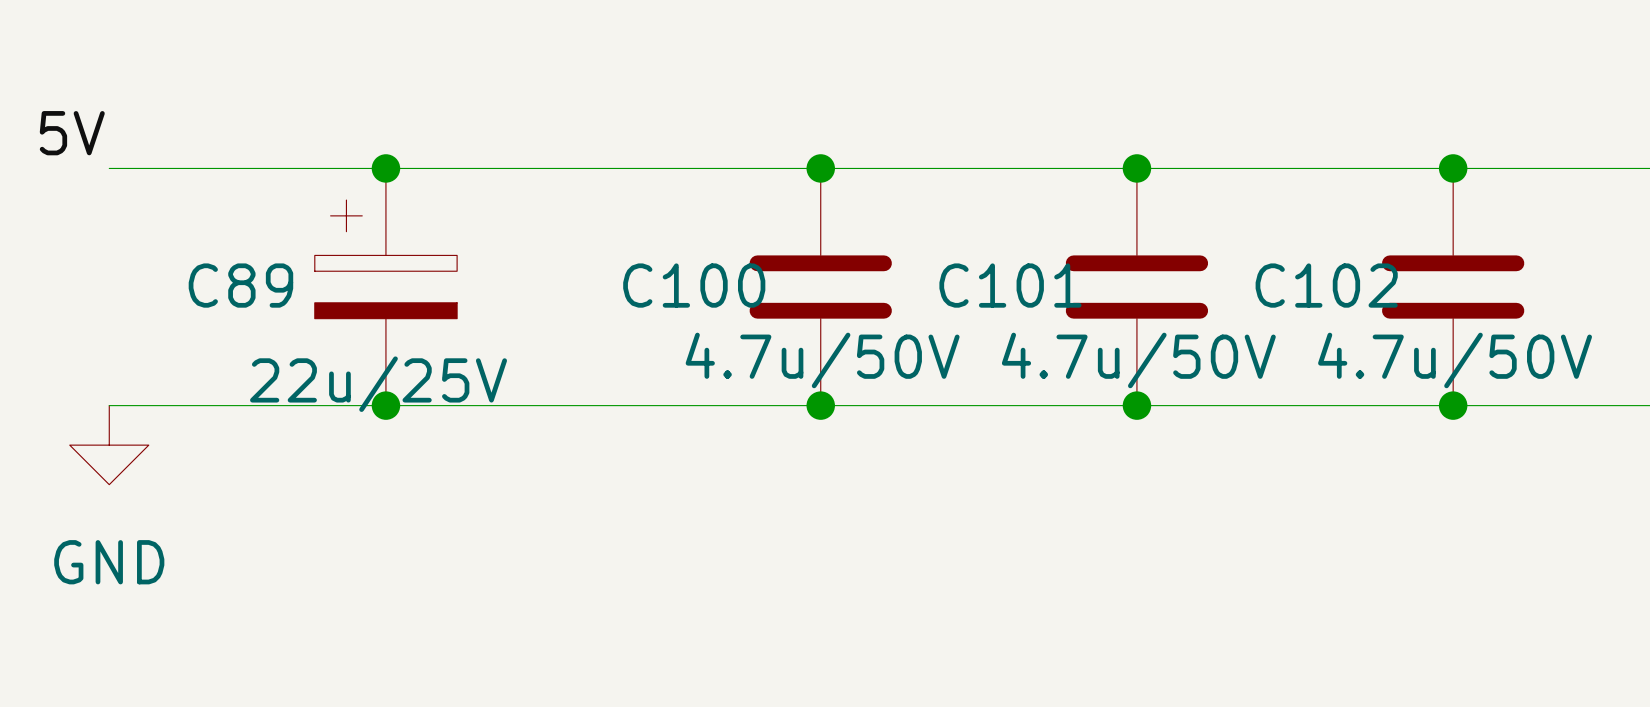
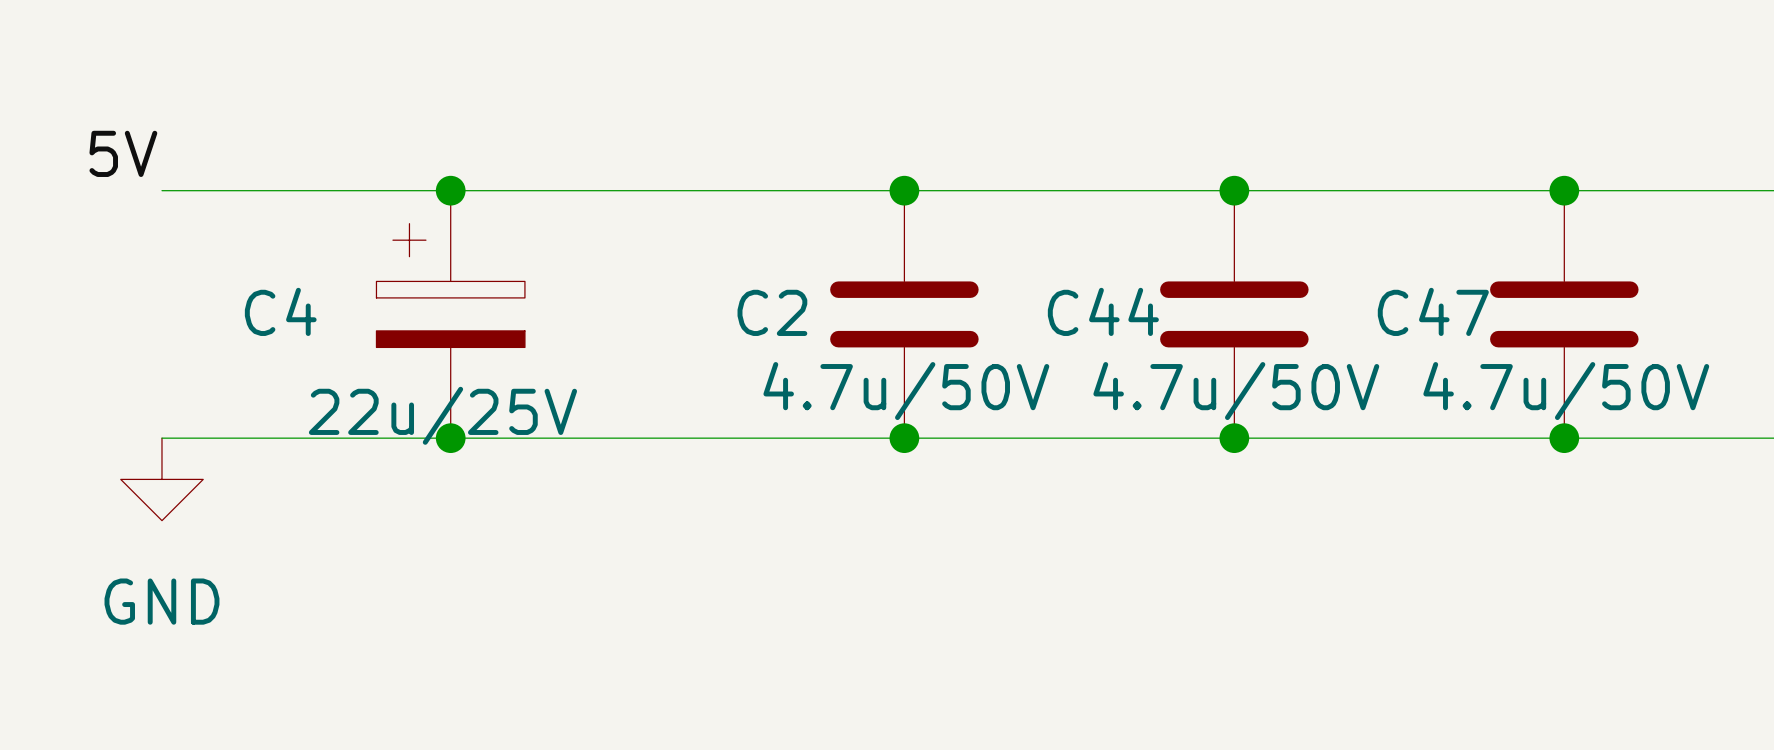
C89 name: C89 (240, 285) -> C4 (280, 311)
C100 name: C100 (694, 285) -> C2 (772, 312)
C101 name: C101 (1010, 285) -> C44 (1103, 311)
C102 name: C102 (1326, 285) -> C47 (1433, 311)

